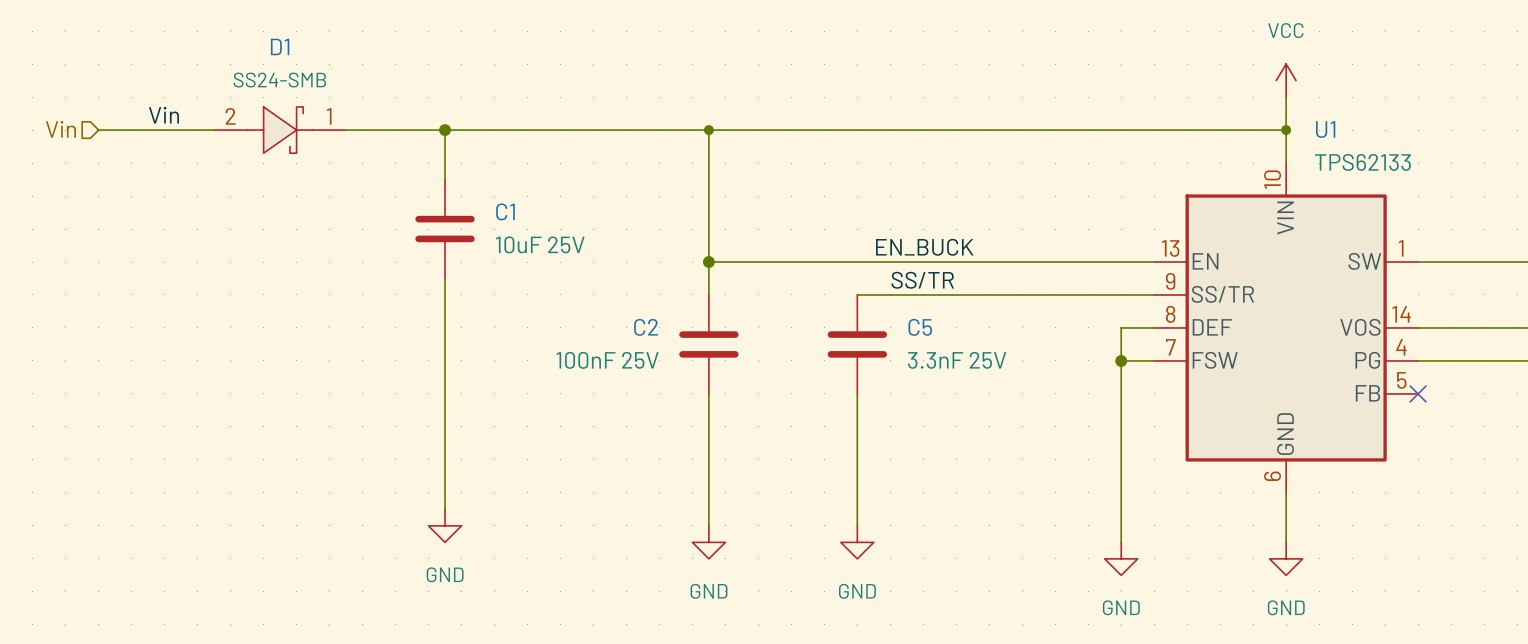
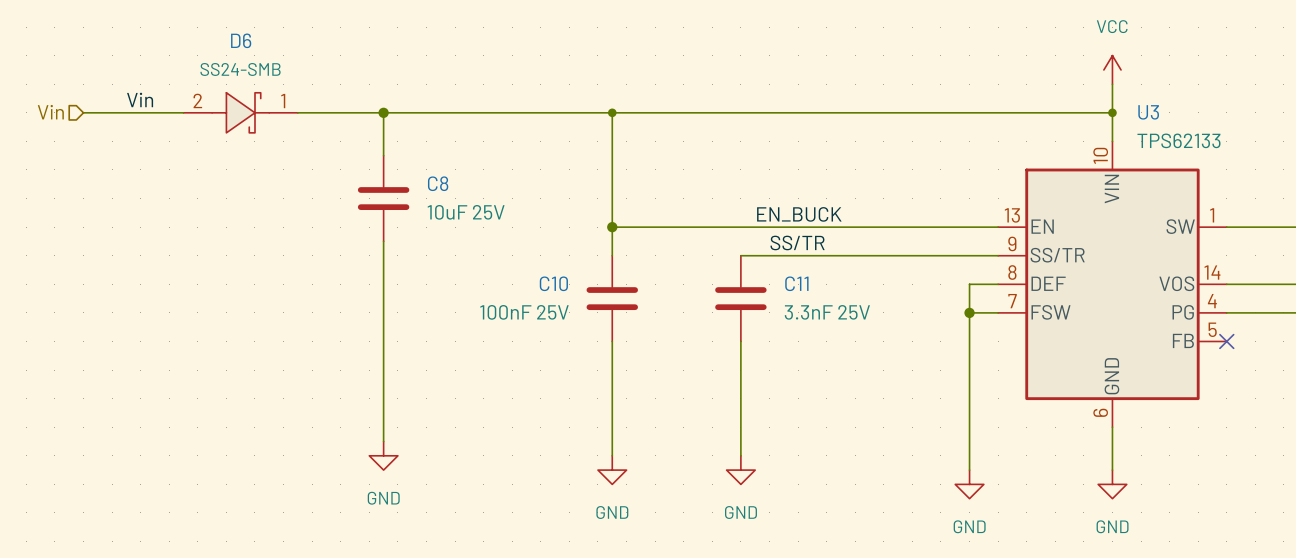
D1 name: D1 (280, 46) -> D6 (241, 40)
U1 name: U1 (1325, 129) -> U3 (1148, 112)
C1 name: C1 (505, 211) -> C8 (438, 183)
C2 name: C2 (646, 327) -> C10 (553, 283)
C5 name: C5 (920, 327) -> C11 (796, 283)

